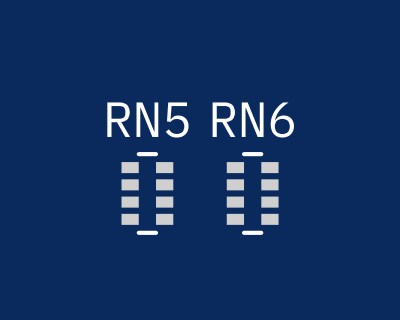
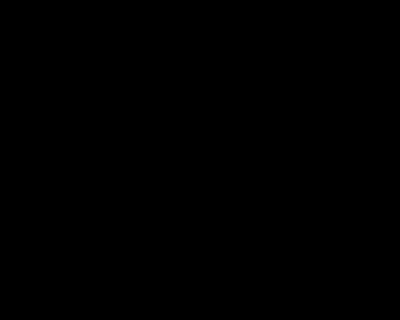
RN5: (147, 193) -> none
RN6: (252, 193) -> none

